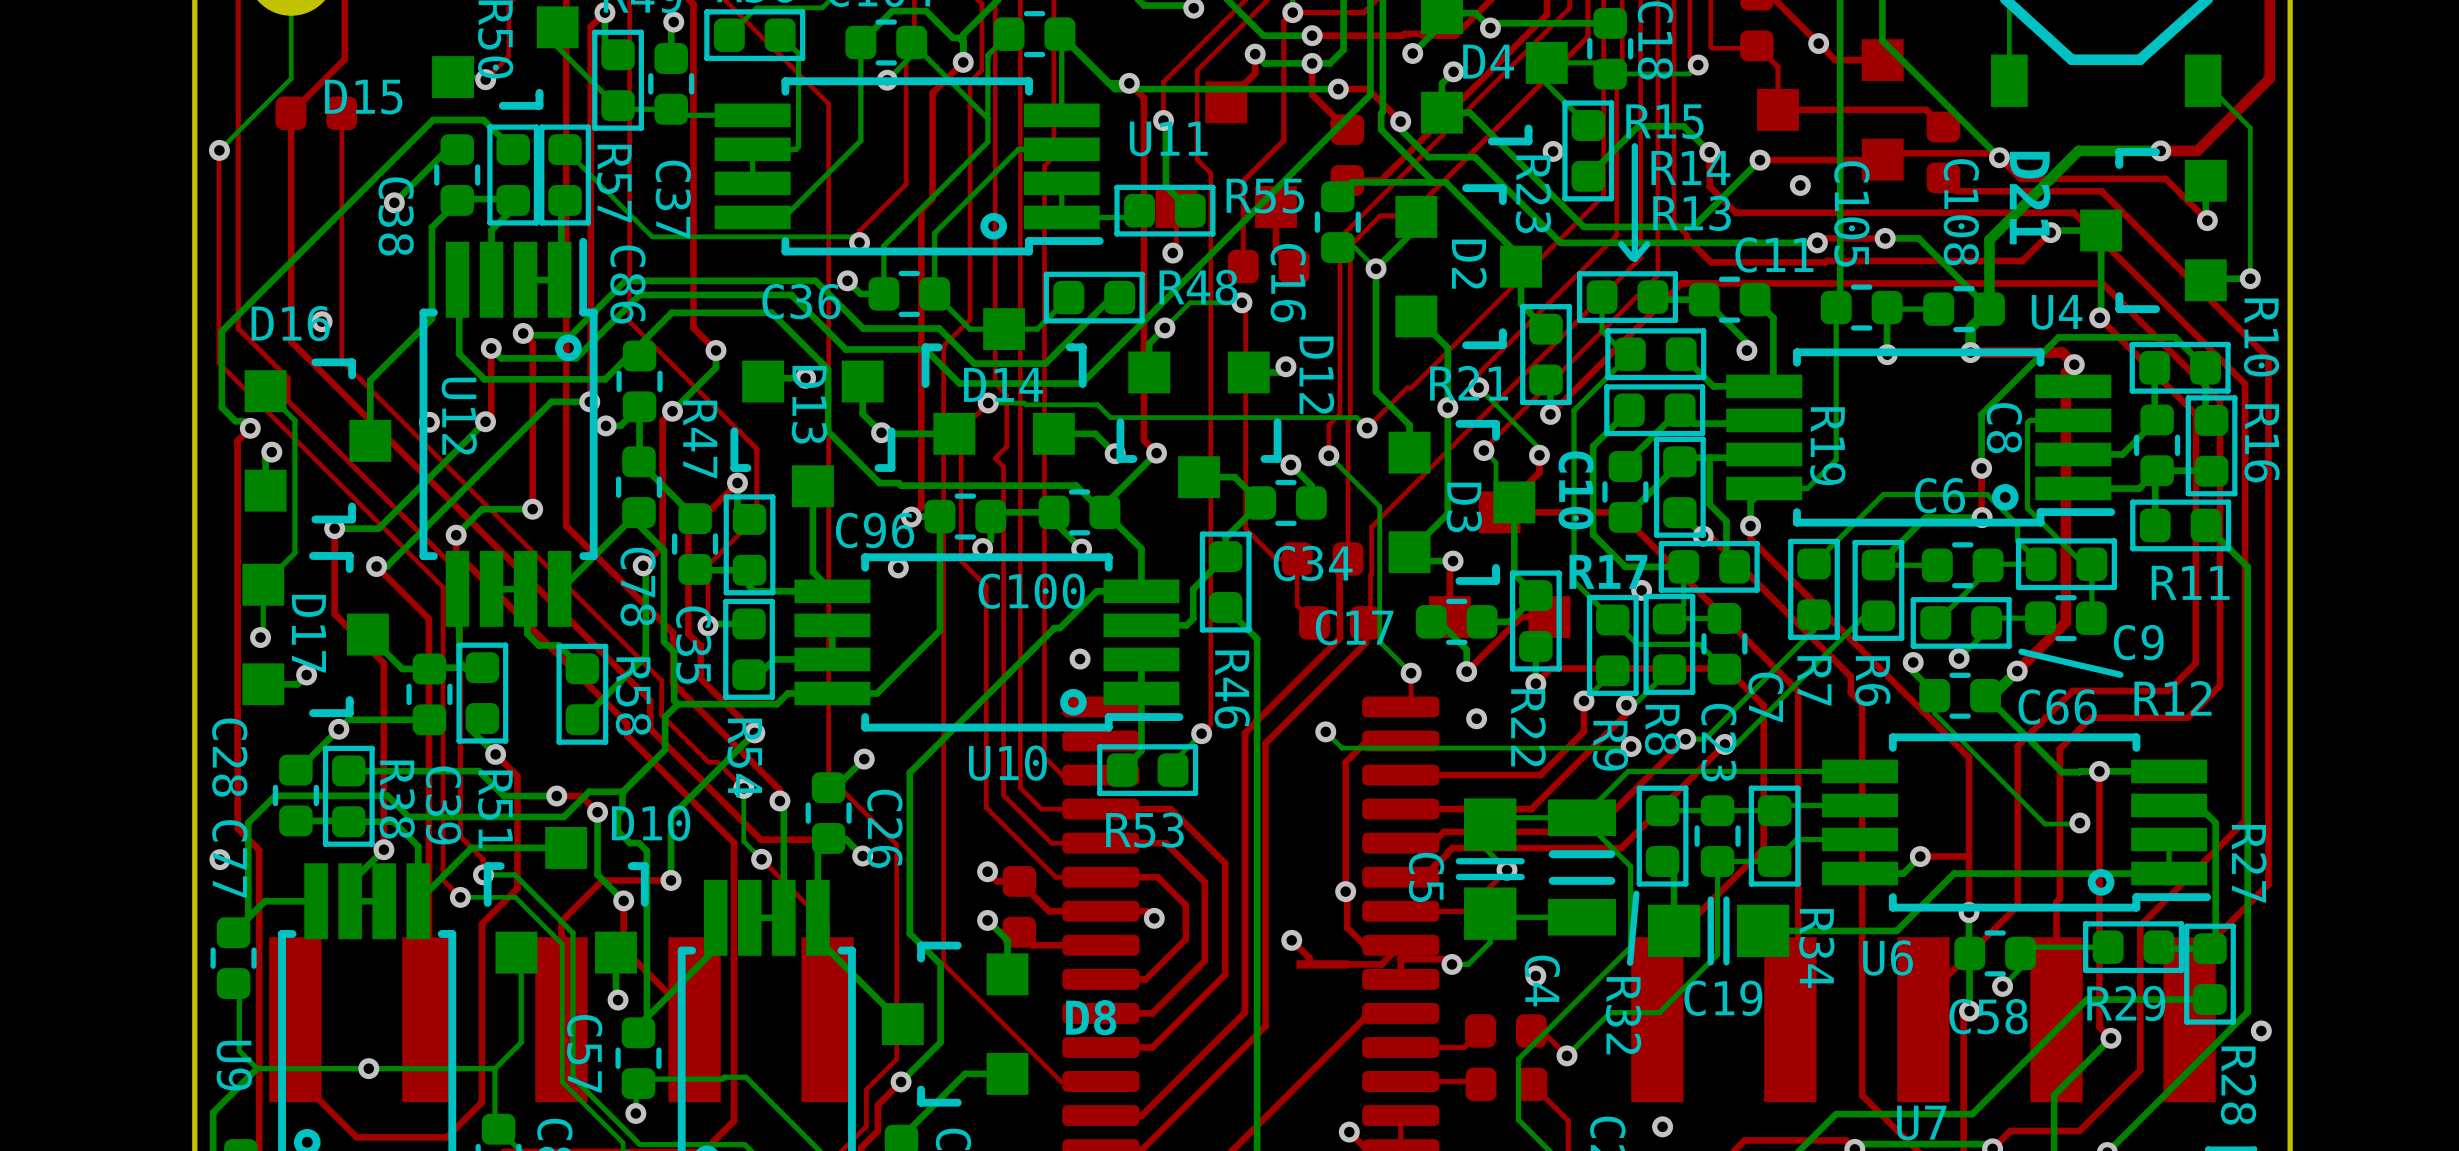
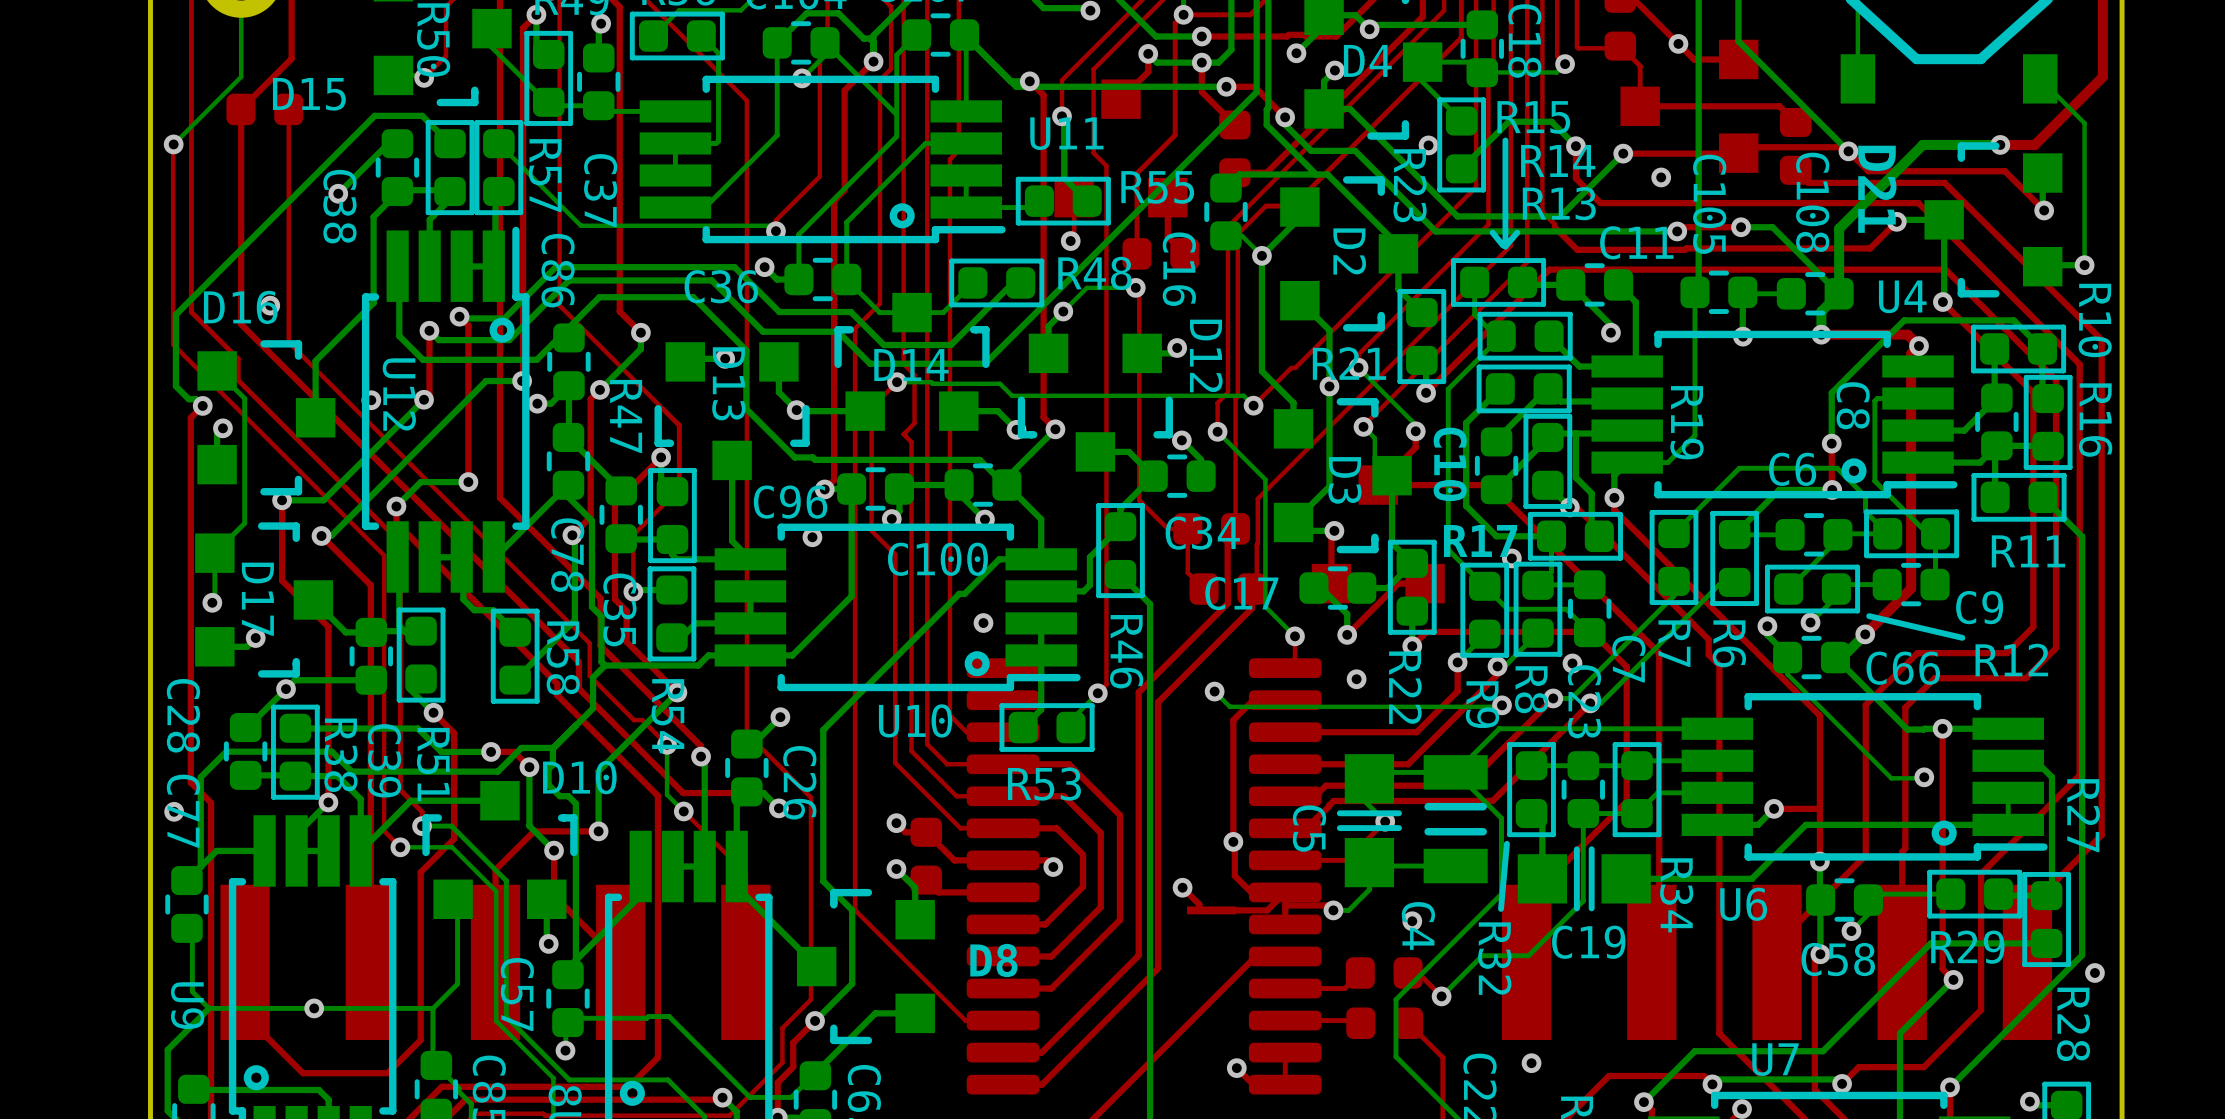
via: none -> (1572, 663)

